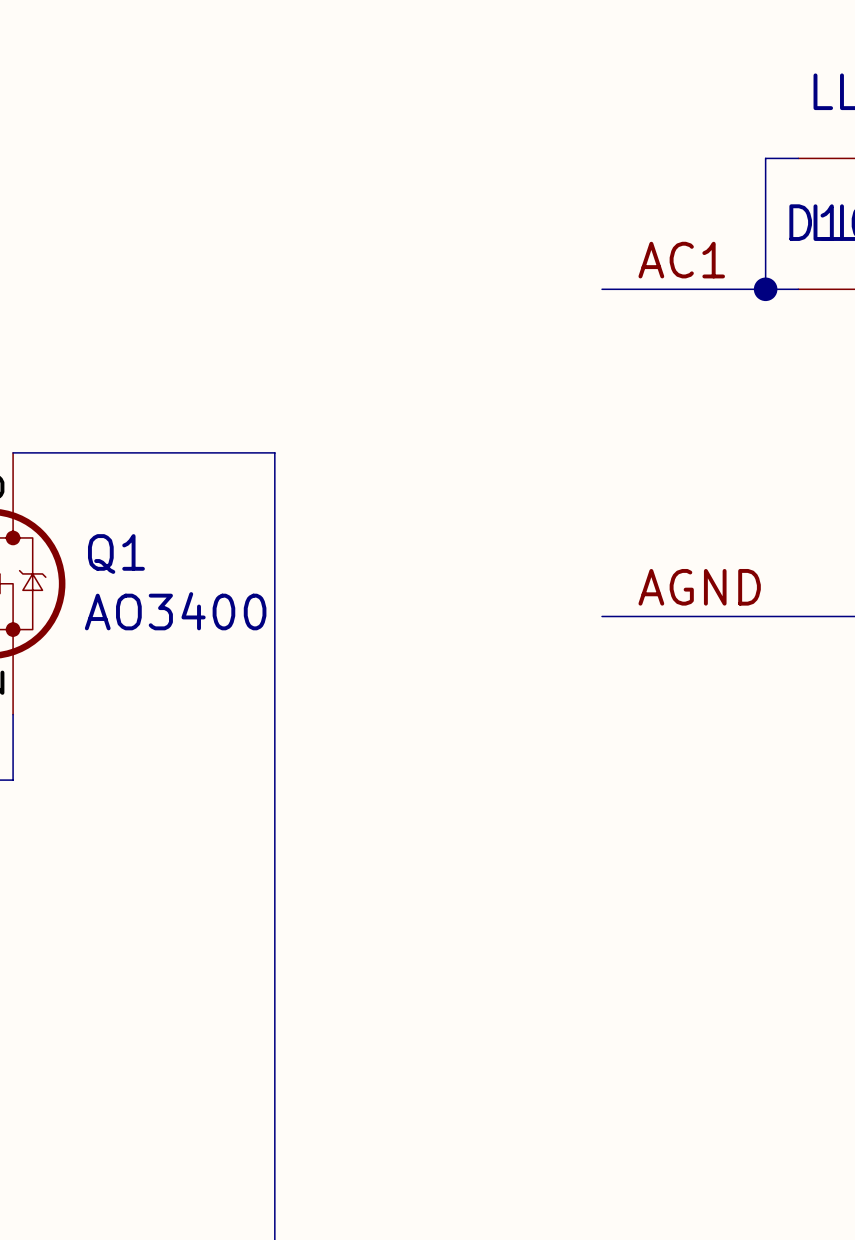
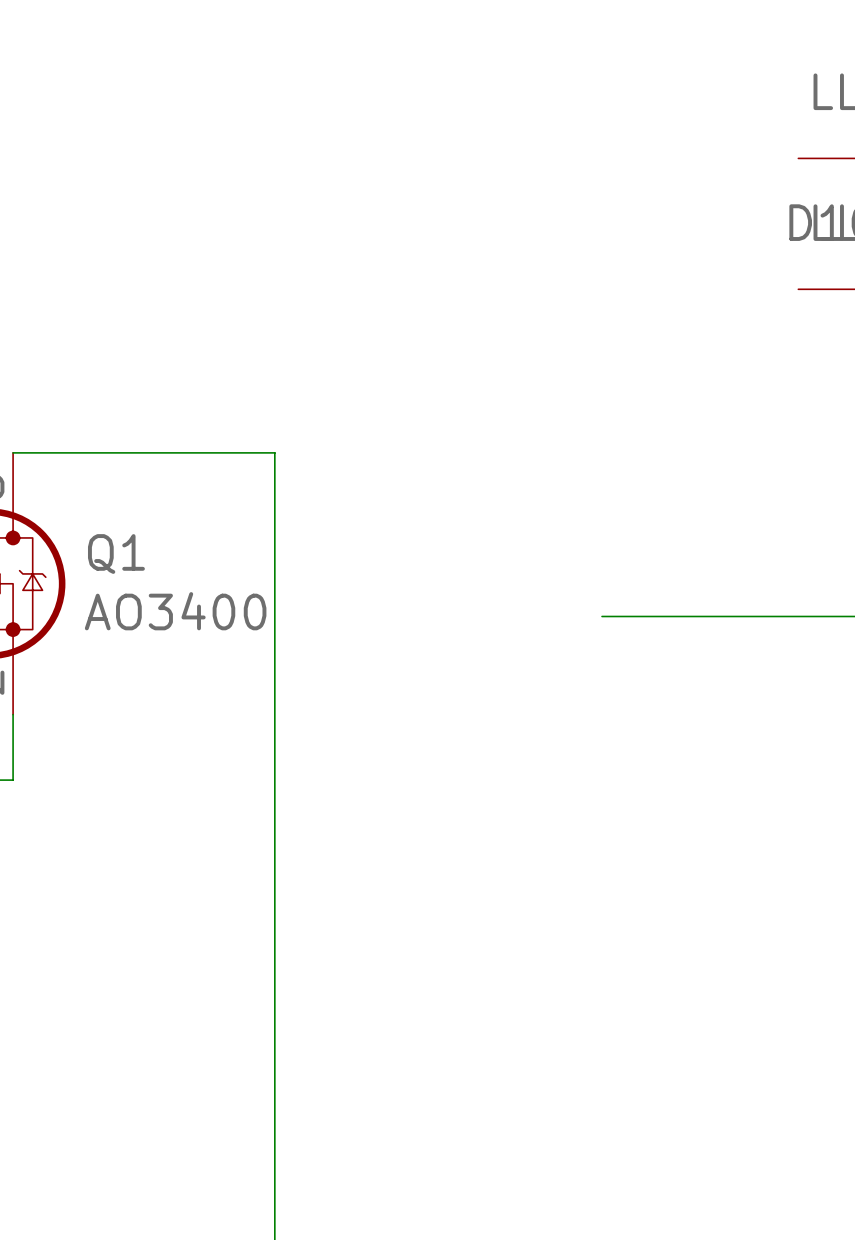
wire: (798, 158) (765, 158) (765, 289) -> none
label: AC1 (681, 260) -> none
wire: (602, 289) (798, 289) -> none
junction: (765, 289) -> none
label: AGND (699, 587) -> none

